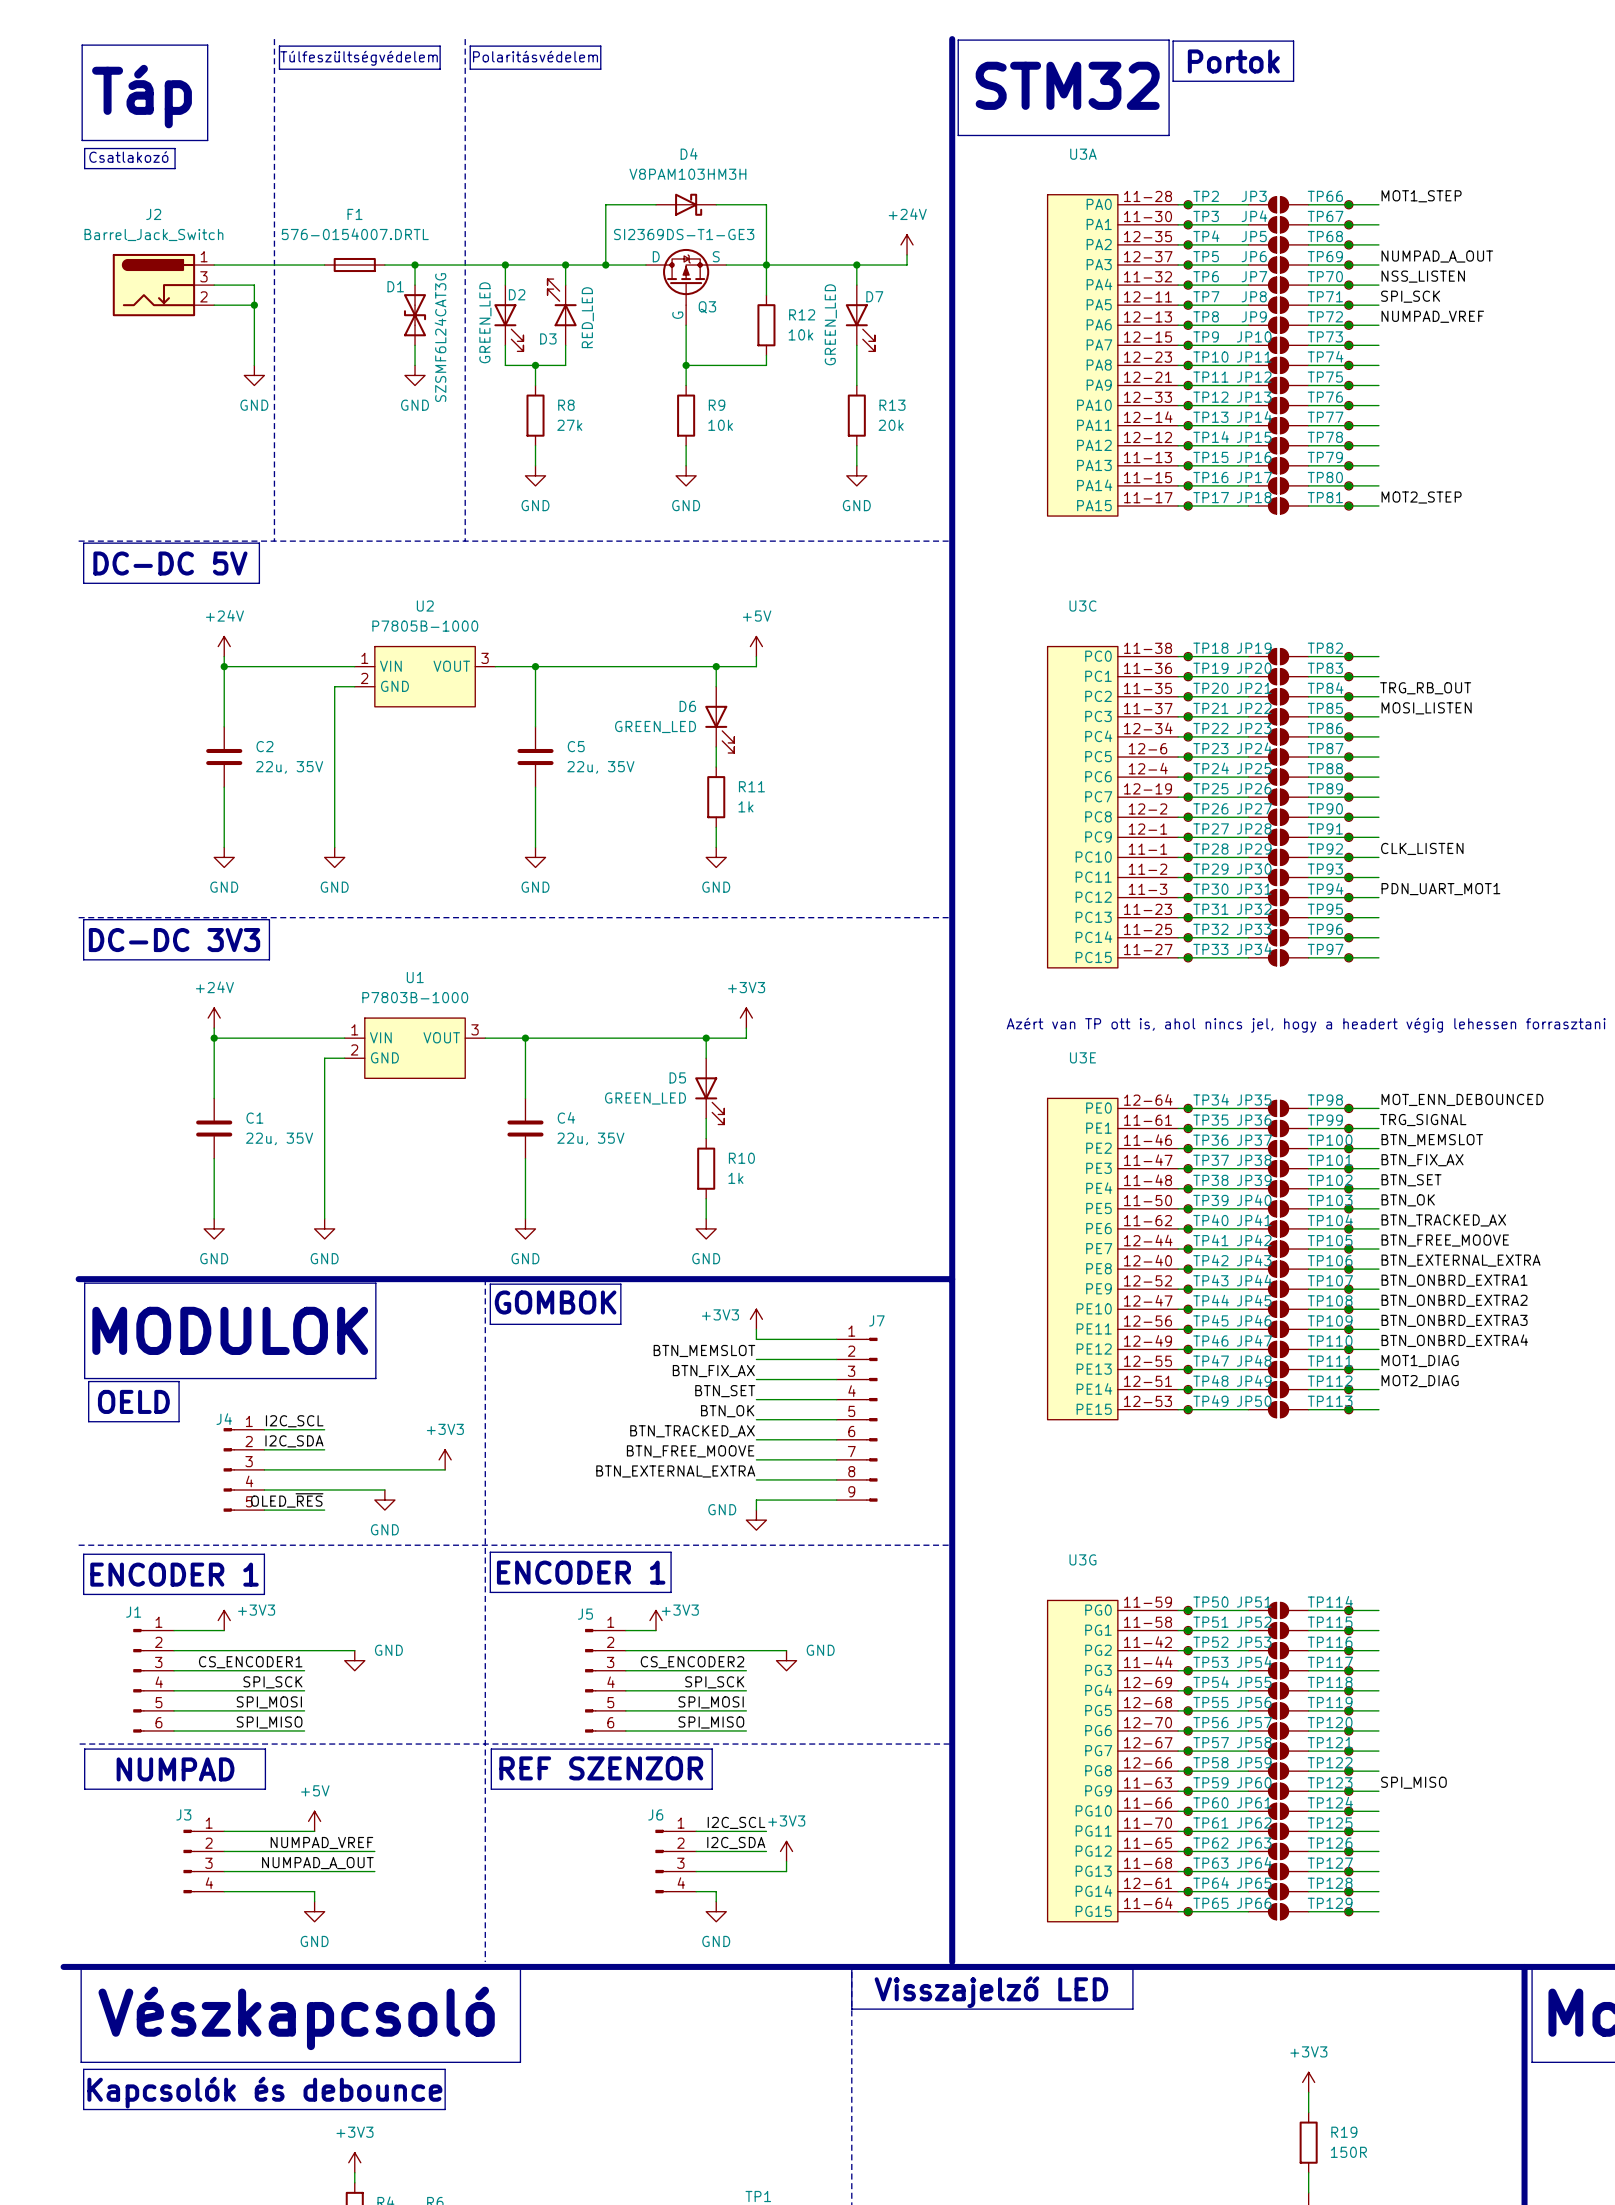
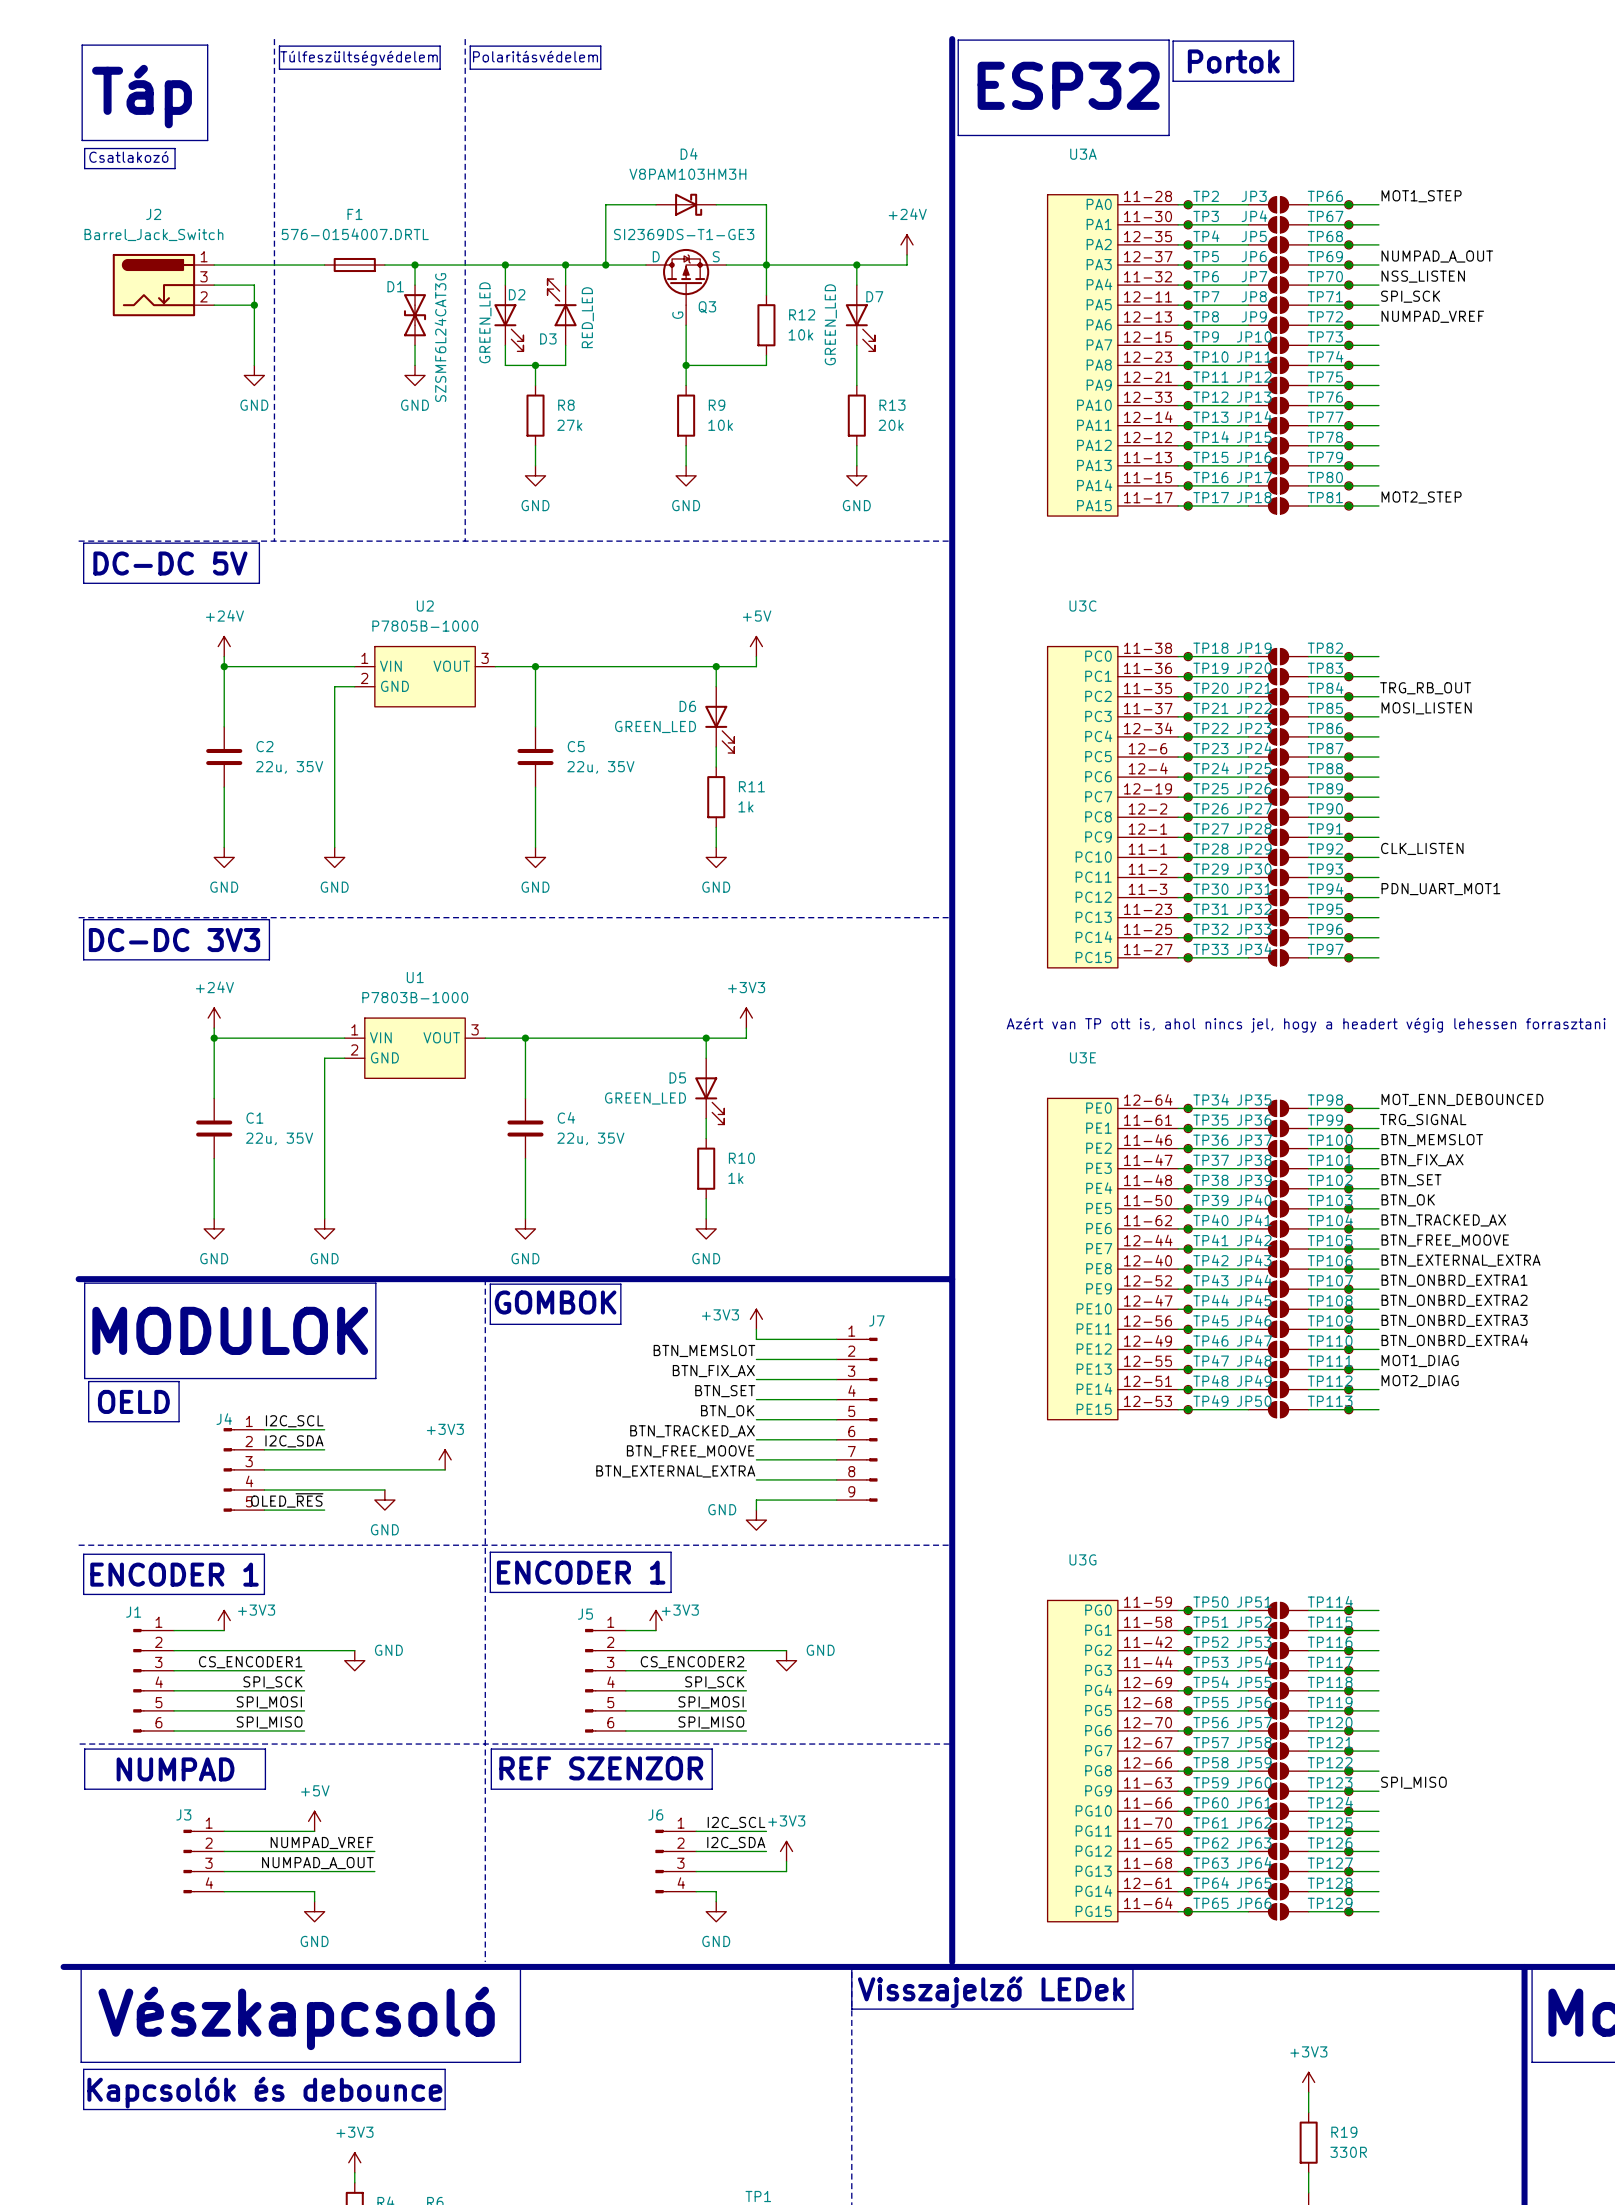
text: STM32 (1067, 85) -> ESP32 (1068, 85)
text: Visszajelző LED (991, 1992) -> Visszajelző LEDek (991, 1992)
R19 value: 150R (1348, 2152) -> 330R (1348, 2152)

